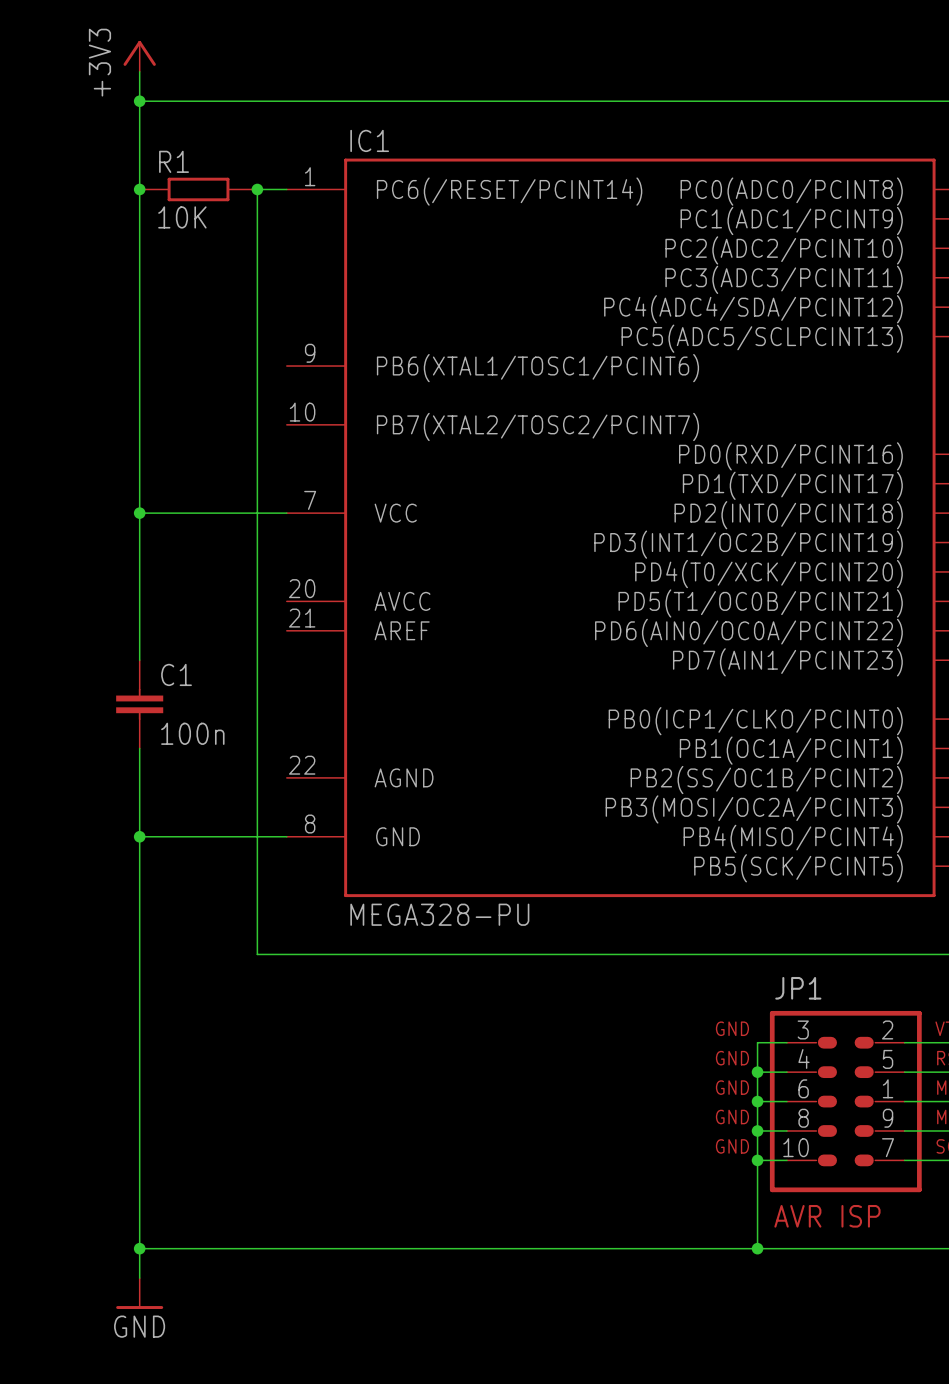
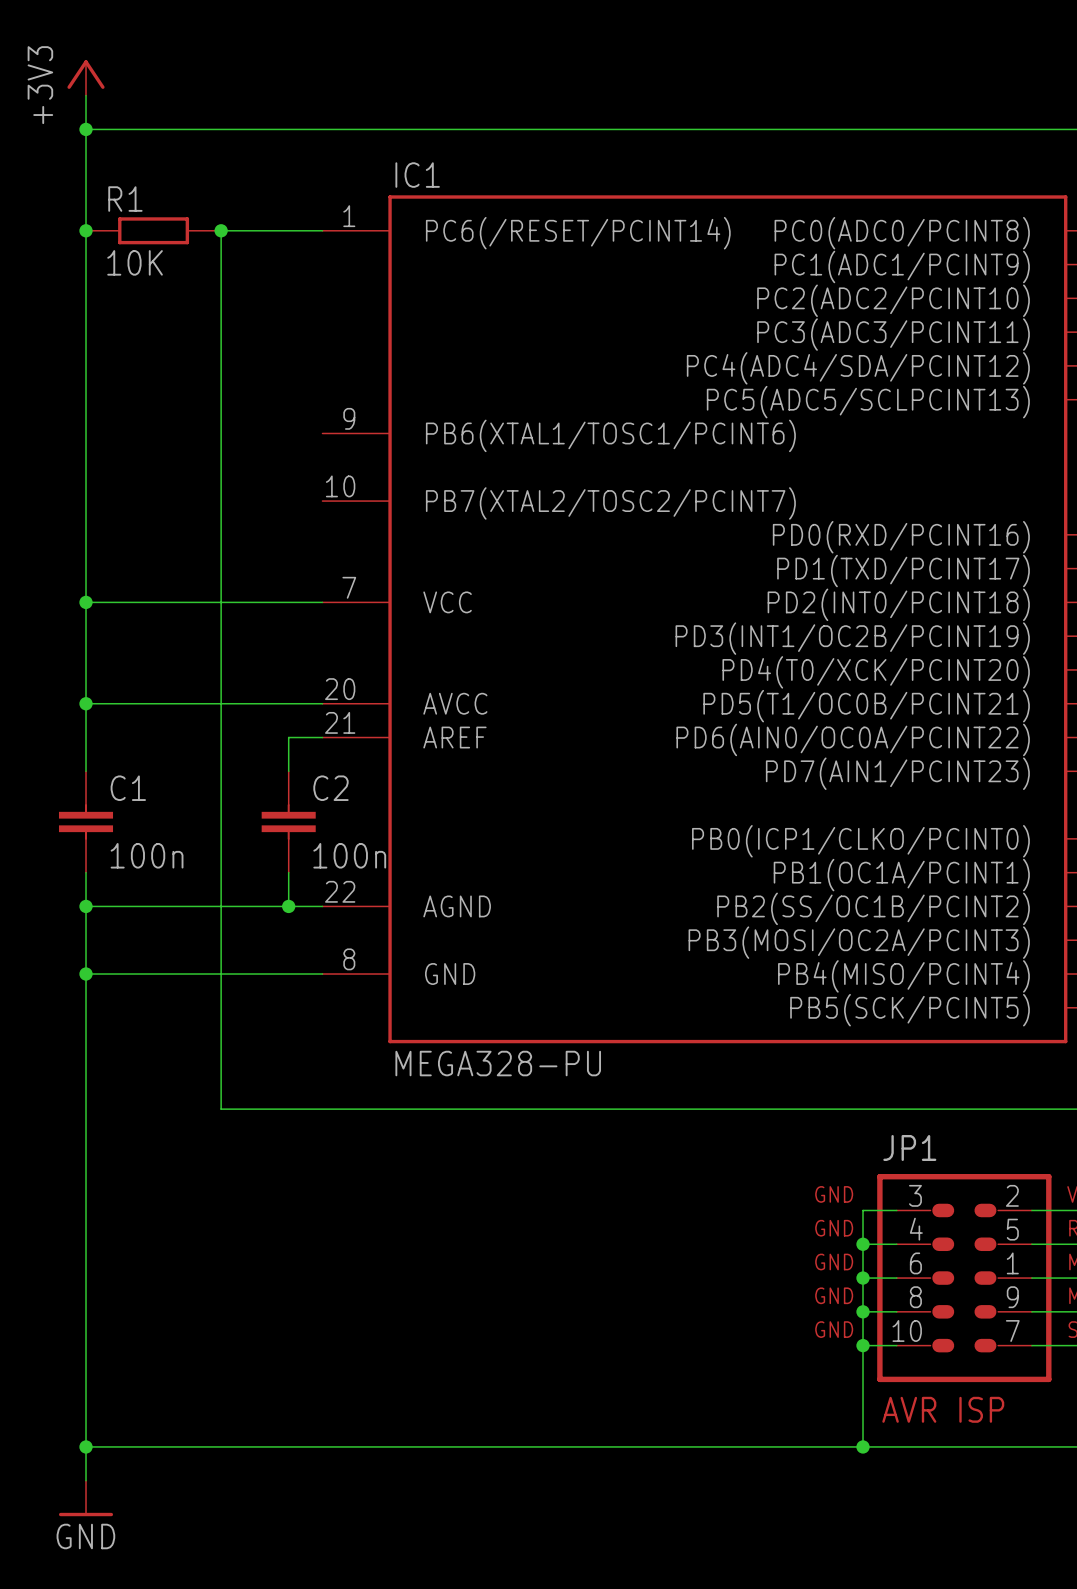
power symbol position: +3V3 (139, 56) -> +3V3 (86, 77)
wire: (139, 71) (139, 660) -> (86, 95) (86, 771)
wire: none -> (86, 129) (153, 129)
junction: none -> (86, 129)
junction: (139, 101) -> none
junction: none -> (86, 230)
junction: (139, 189) -> none
R1 position: (198, 189) -> (153, 230)
junction: none -> (221, 230)
wire: (257, 189) (257, 630) -> (288, 230) (221, 230) (221, 1109) (288, 1109)
junction: (257, 189) -> none
wire: none -> (86, 602) (153, 602)
junction: none -> (86, 602)
junction: (139, 513) -> none
wire: none -> (86, 703) (322, 703)
junction: none -> (86, 703)
wire: none -> (288, 737) (322, 737)
C1 position: (139, 704) -> (86, 821)
C2: none -> 100n (288, 821)
wire: (139, 748) (139, 1278) -> (86, 872) (86, 1480)
wire: none -> (86, 906) (322, 906)
junction: none -> (86, 906)
wire: (257, 777) (257, 954) -> none
junction: none -> (288, 906)
wire: none -> (86, 974) (153, 974)
junction: none -> (86, 974)
junction: (139, 836) -> none
wire: none -> (86, 1446) (153, 1446)
junction position: (139, 1248) -> (86, 1446)
power symbol position: GND (139, 1293) -> GND (86, 1498)

